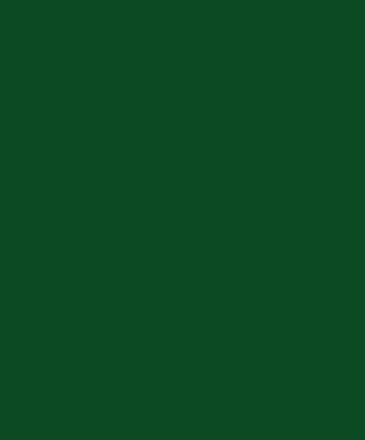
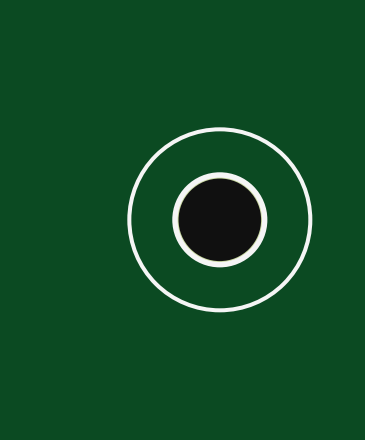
part: none -> (219, 219)

